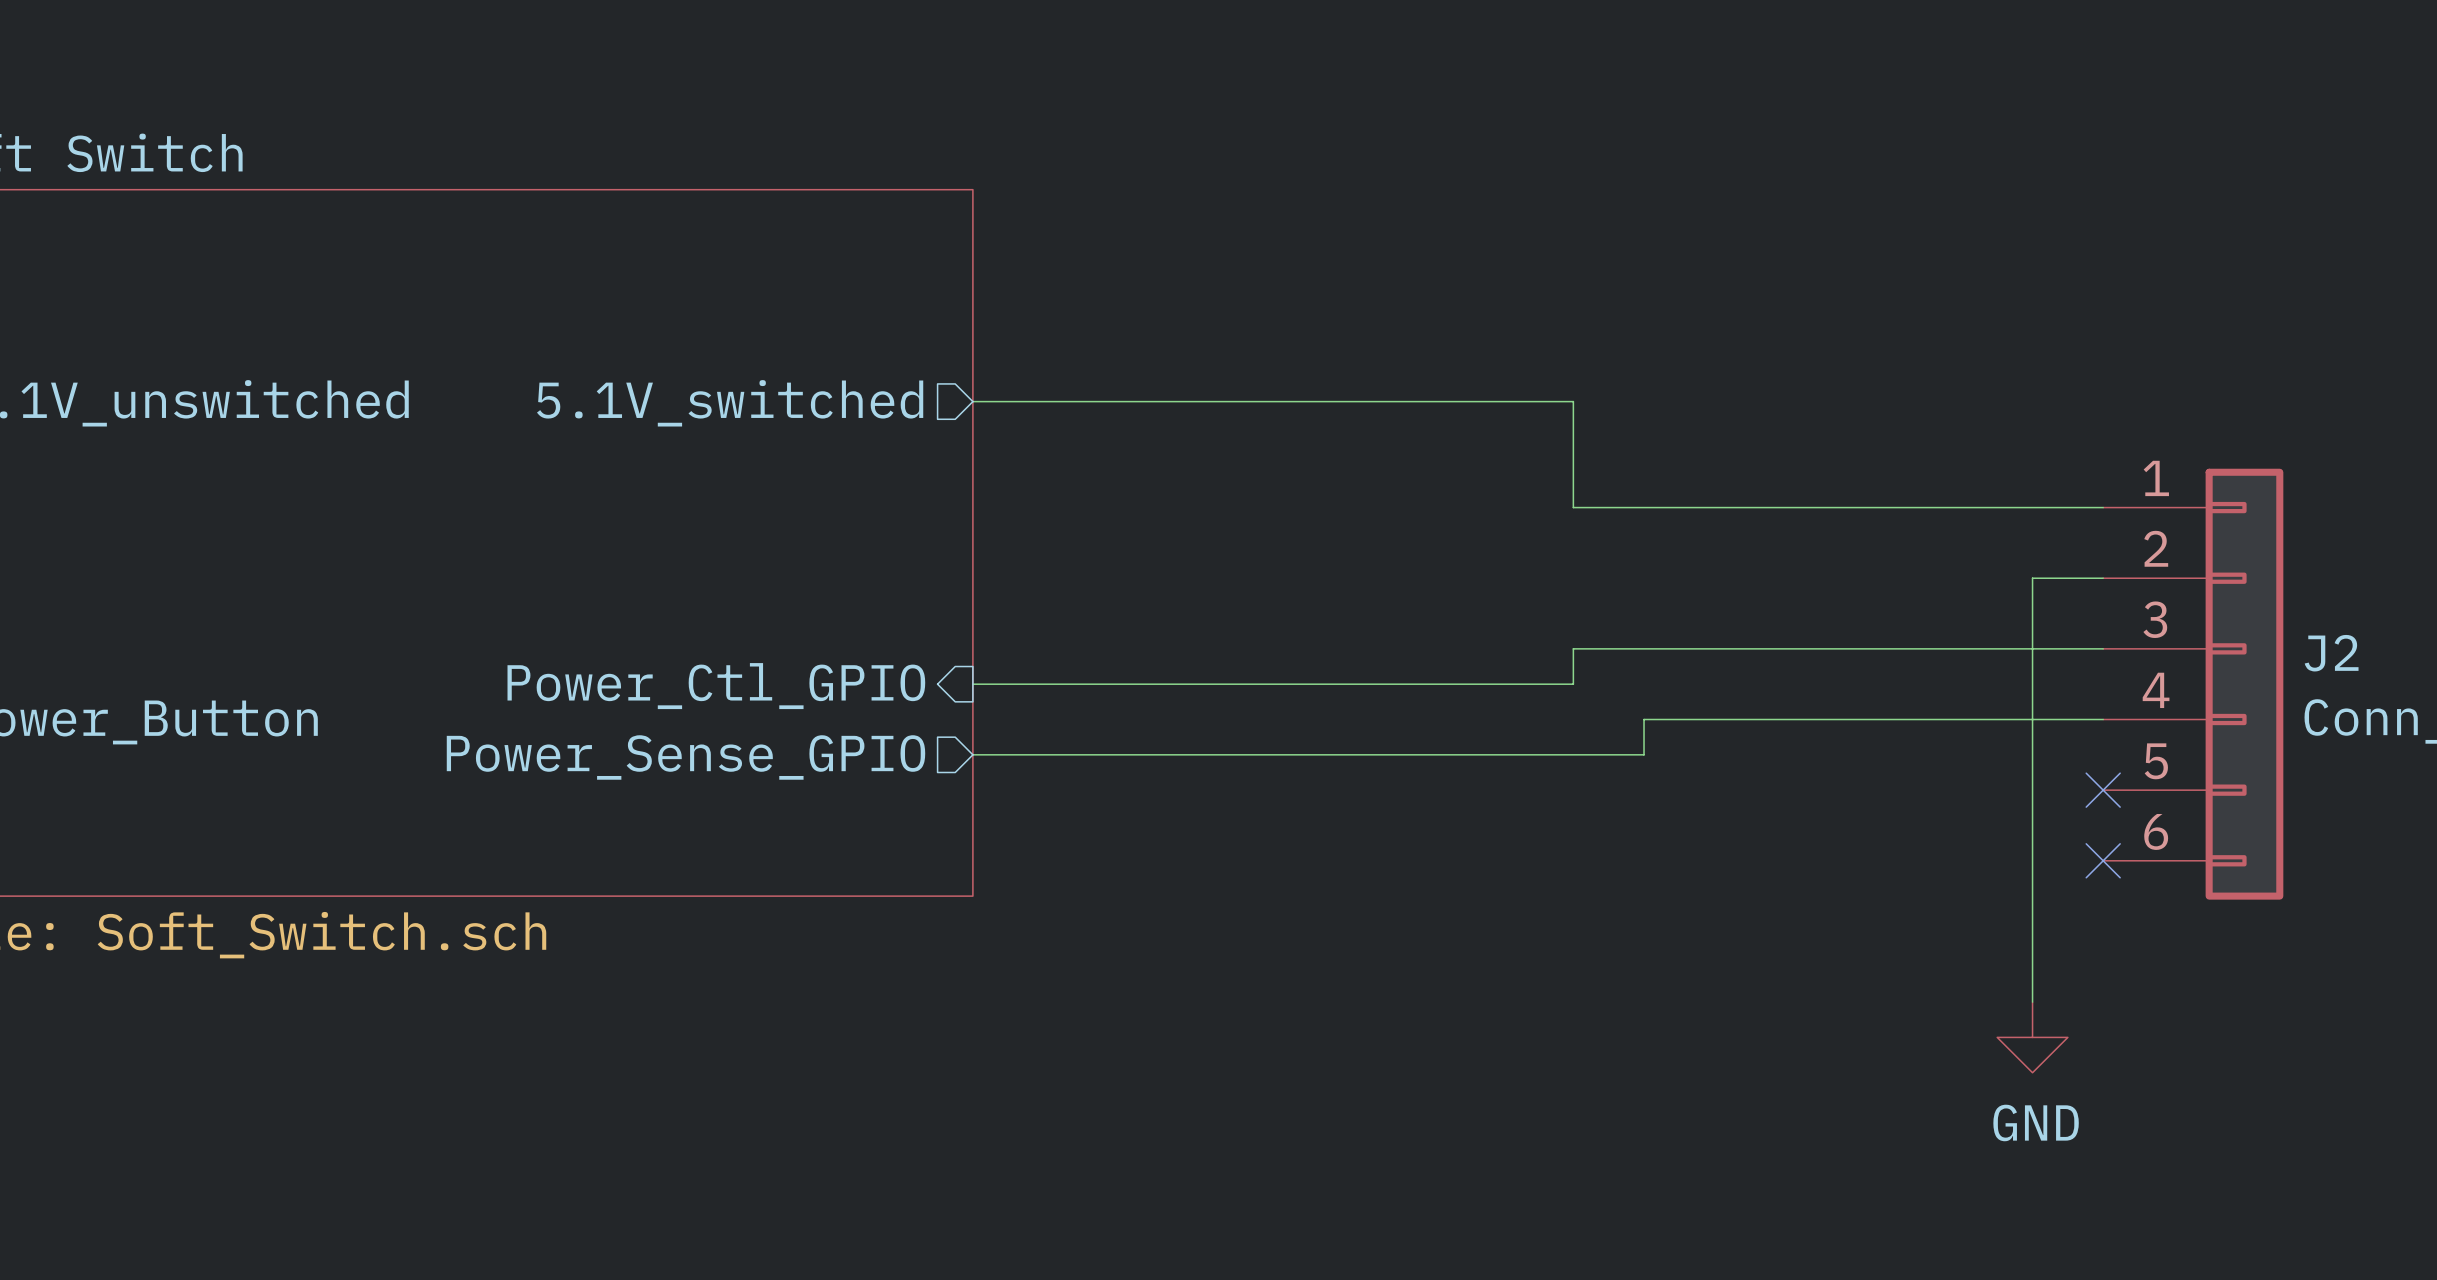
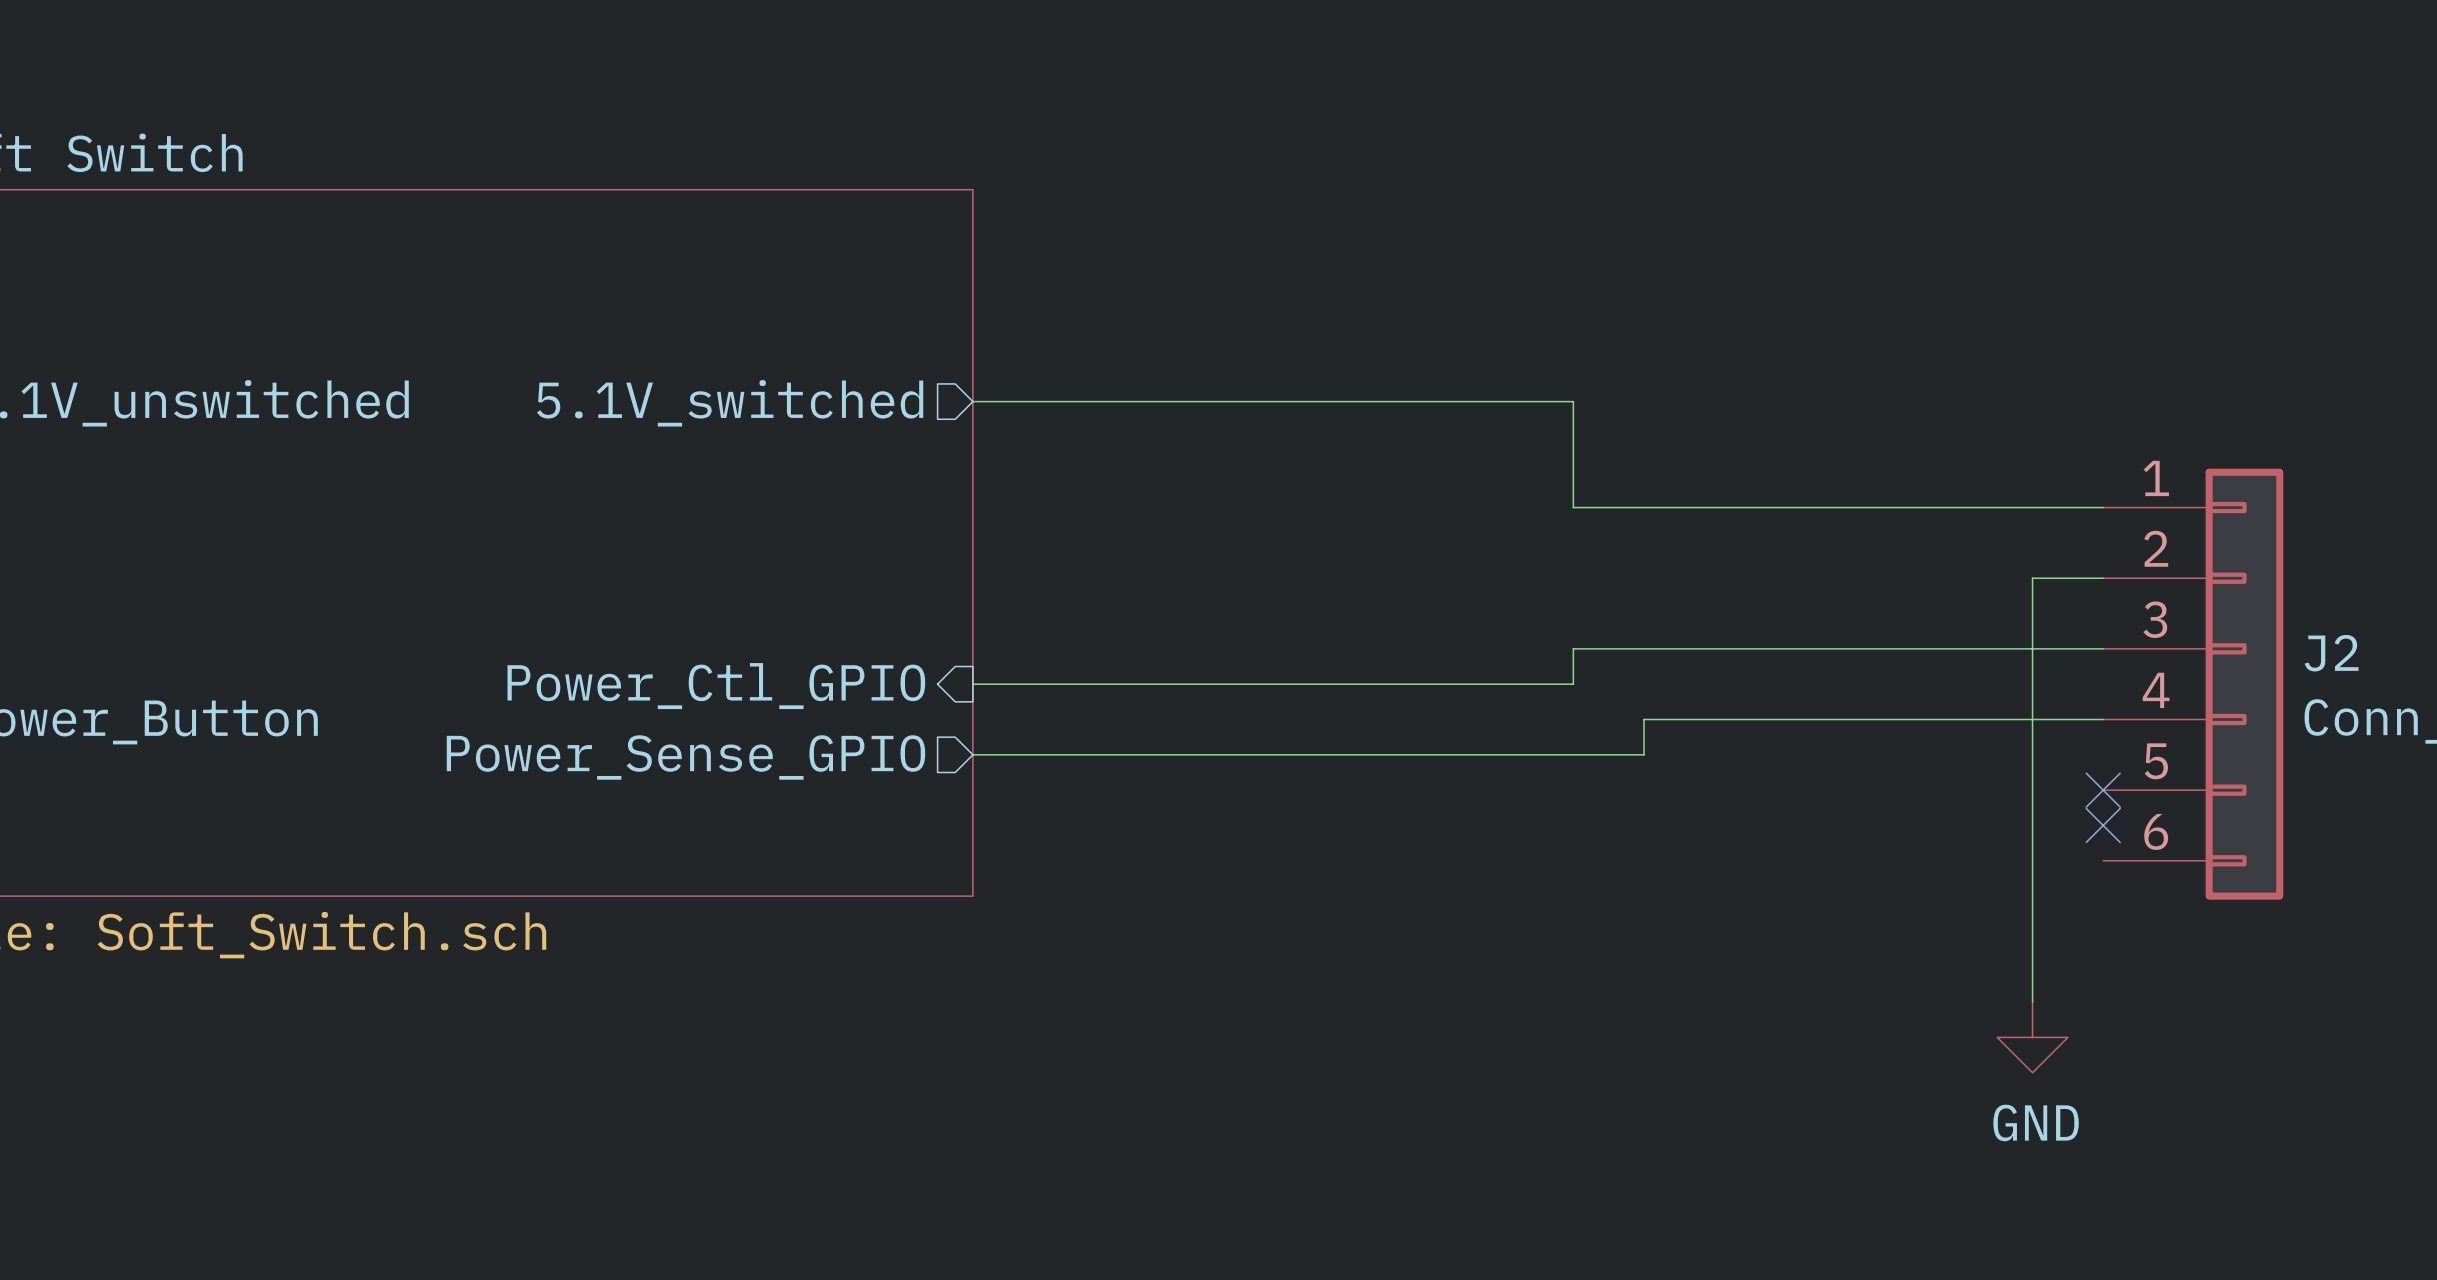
no-connect mark position: (2103, 860) -> (2103, 825)

